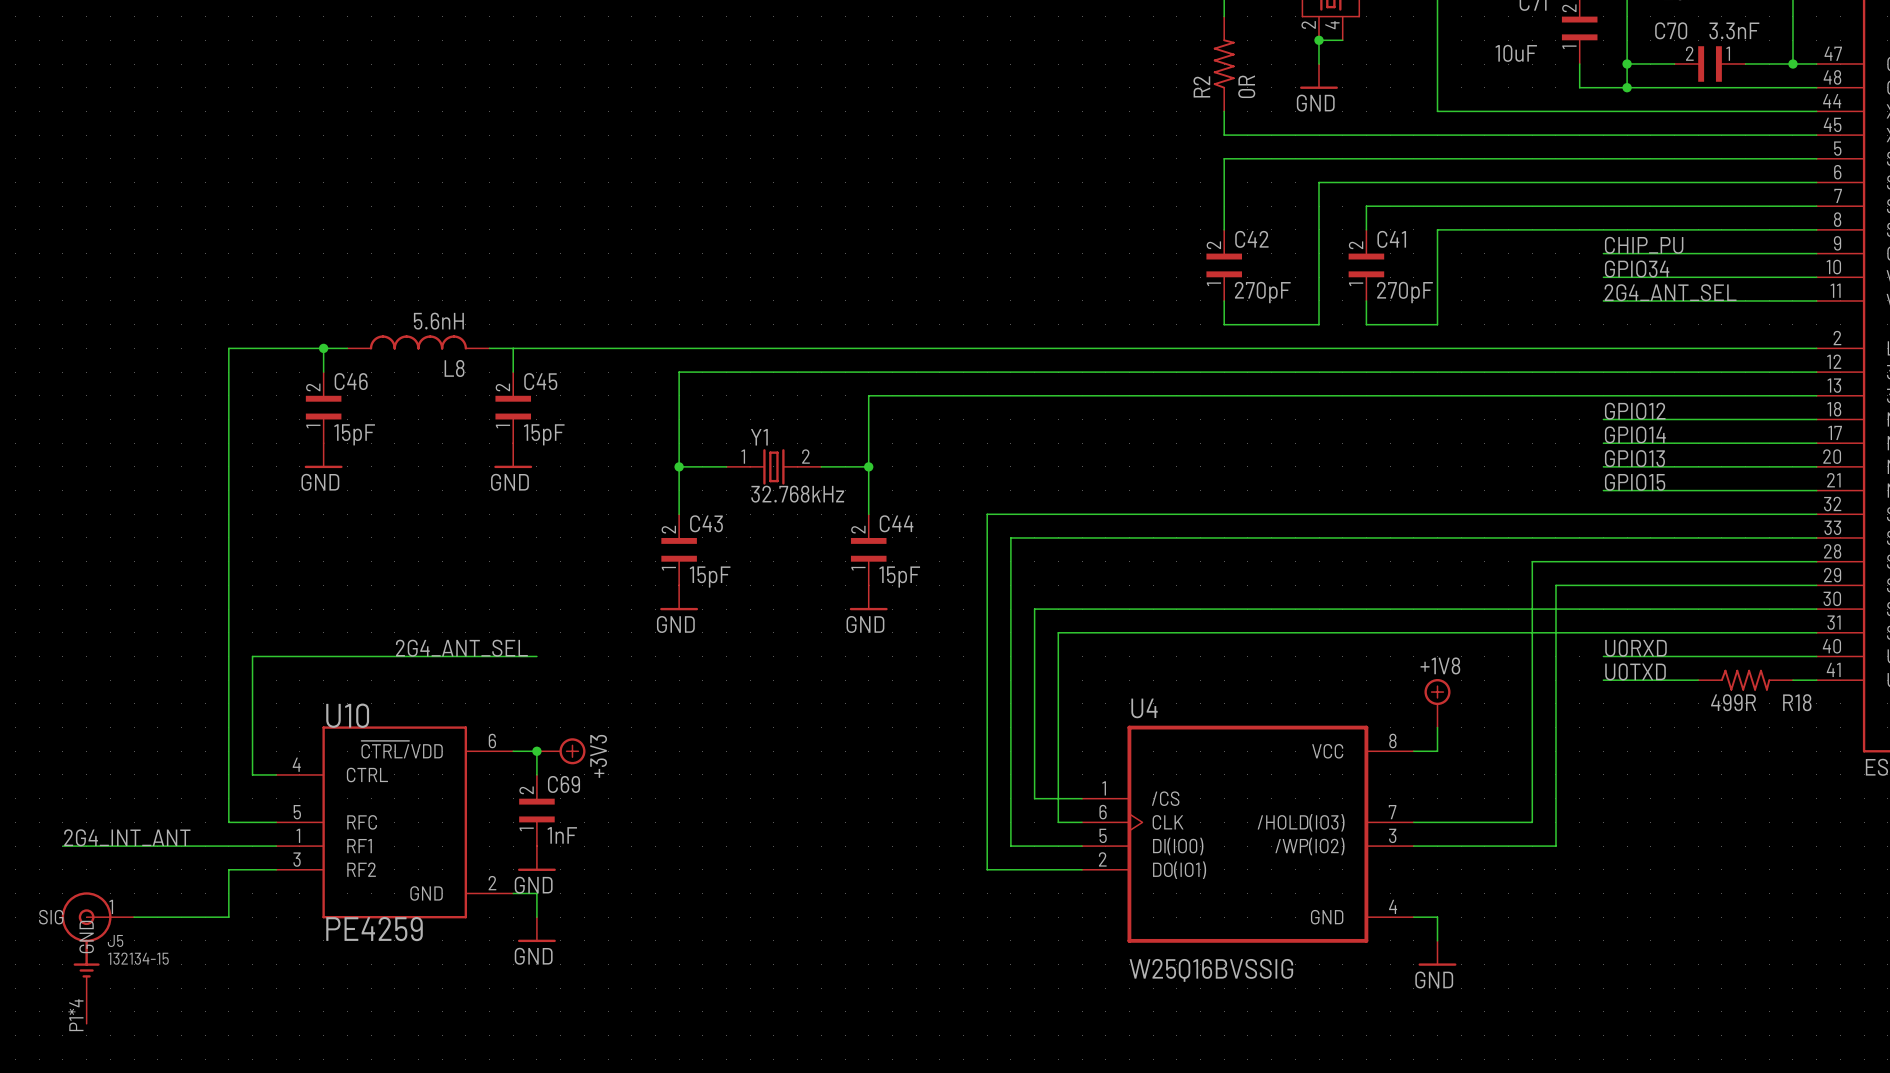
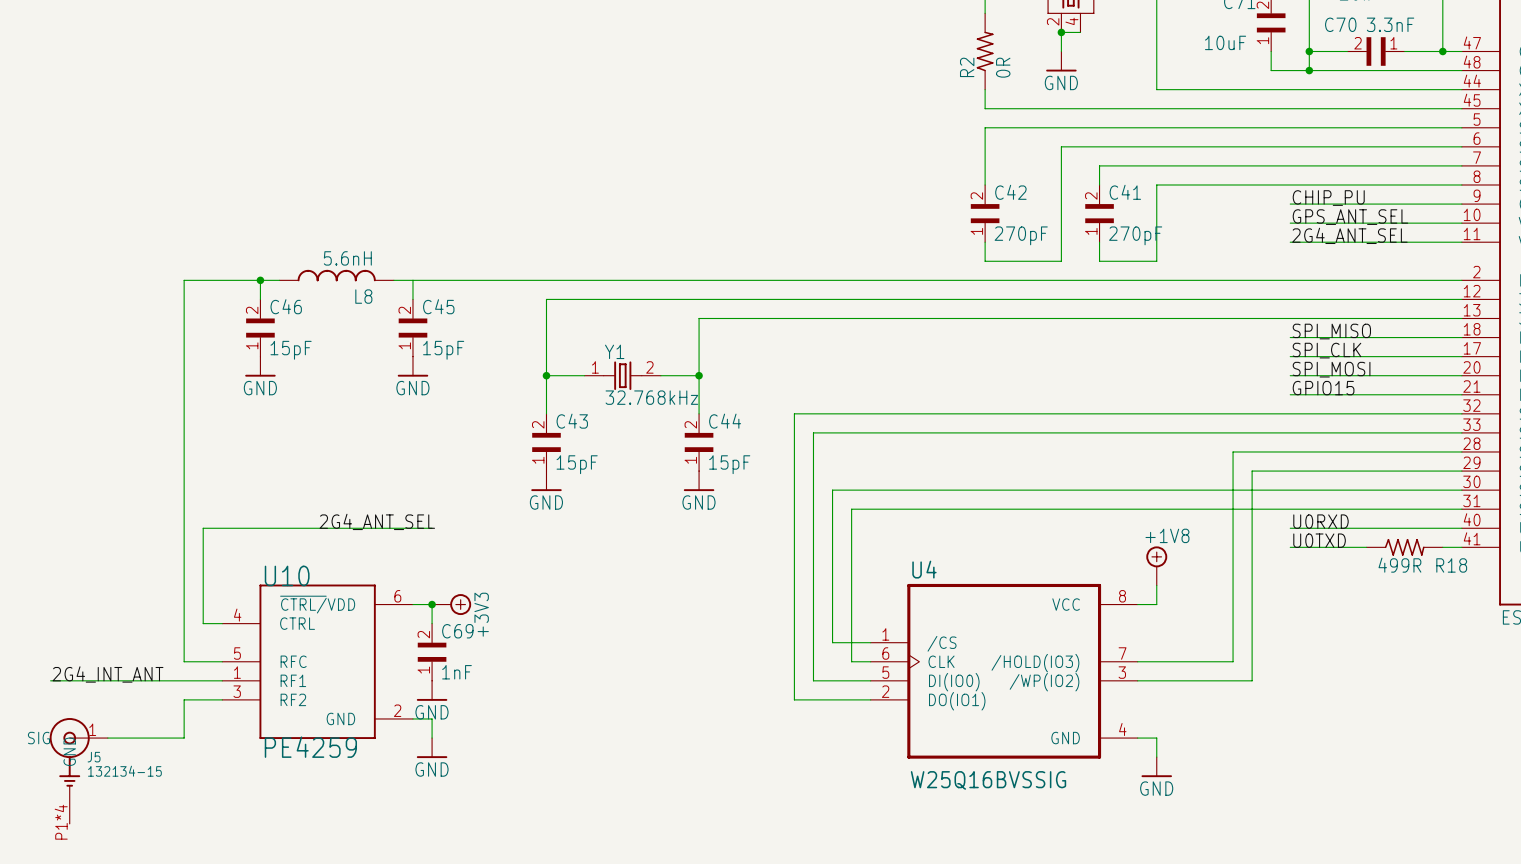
label: GPIO34 (1637, 269) -> GPS_ANT_SEL (1350, 217)
label: GPIO12 (1635, 411) -> SPI_MISO (1331, 331)
label: GPIO14 (1635, 434) -> SPI_CLK (1326, 350)
label: GPIO13 (1634, 458) -> SPI_MOSI (1331, 369)

